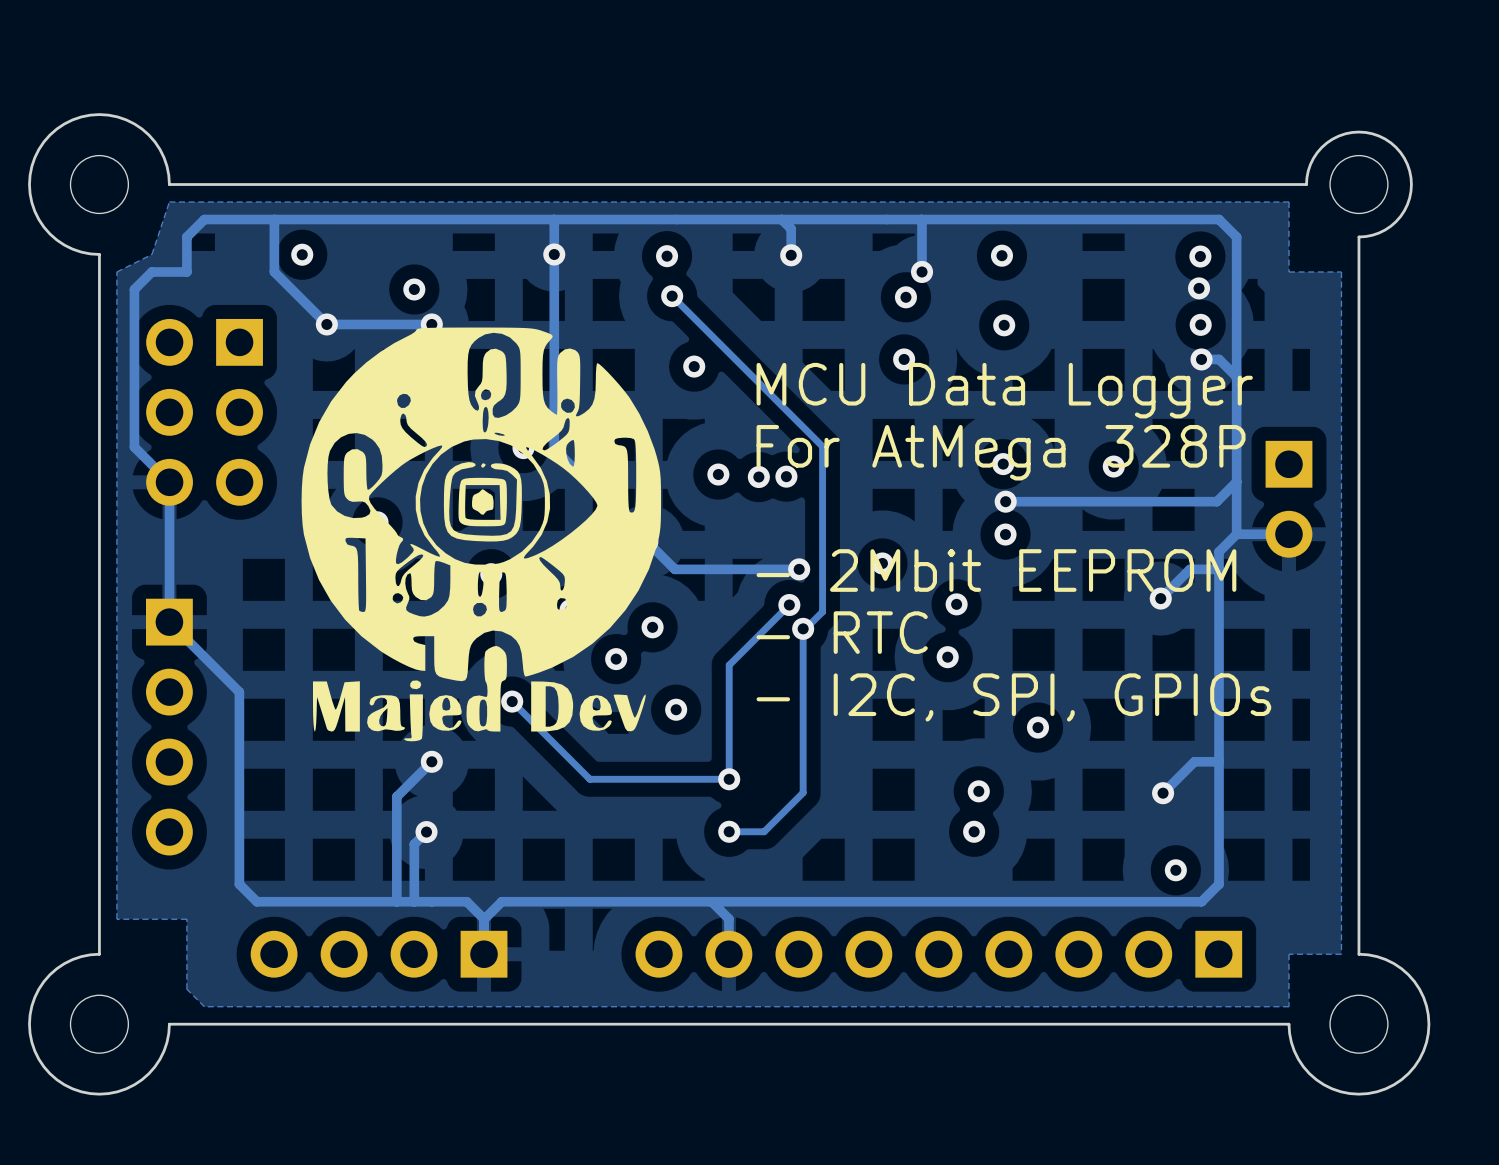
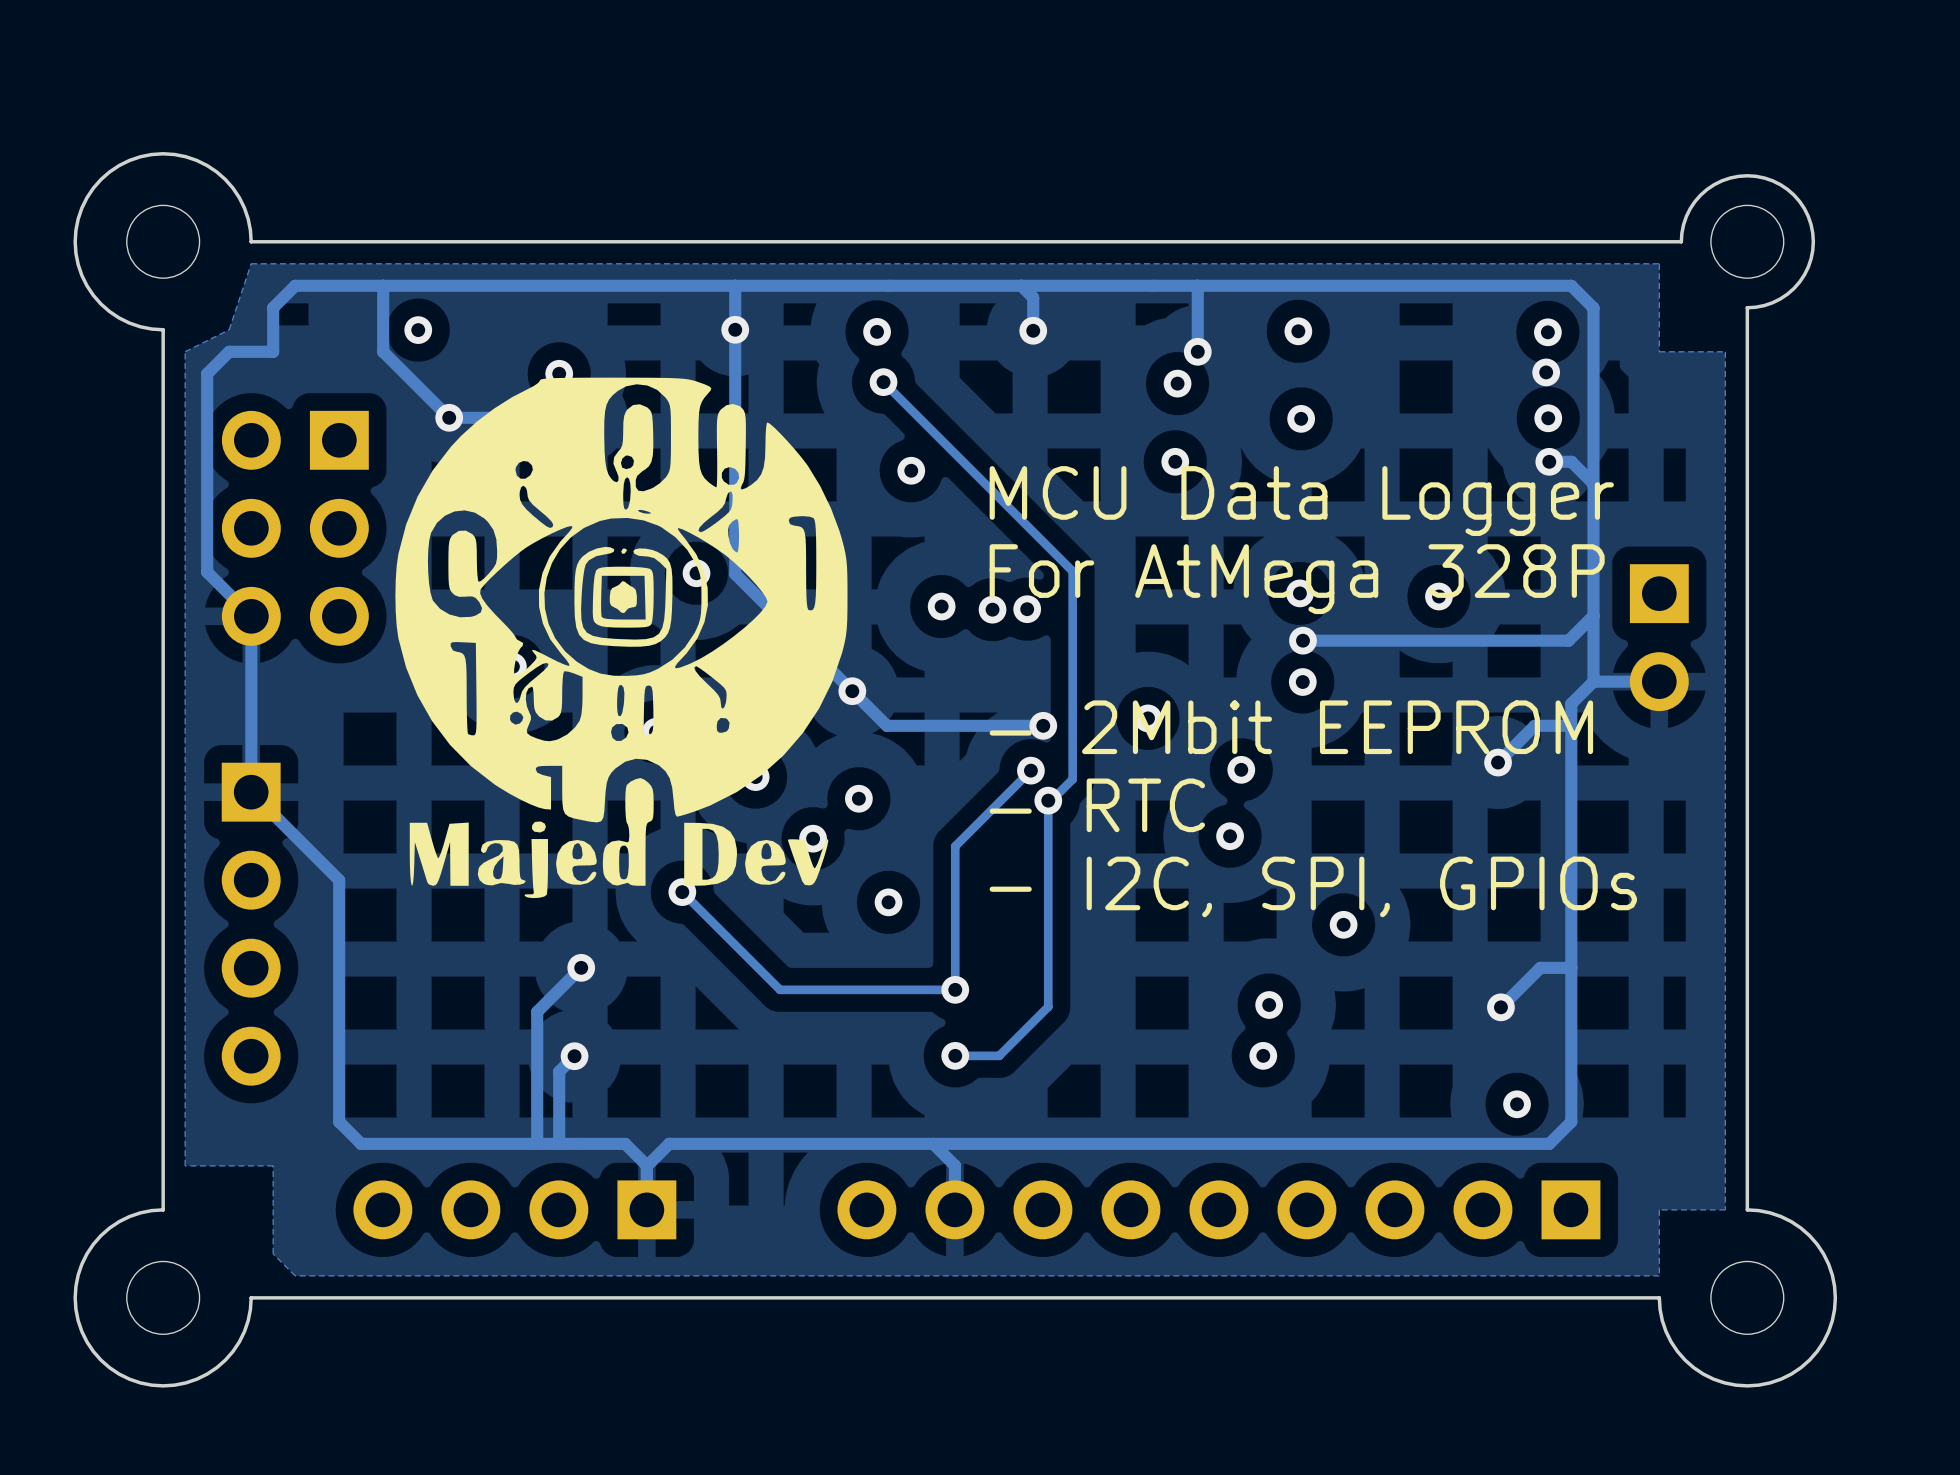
drawing position: (481, 534) -> (621, 637)

